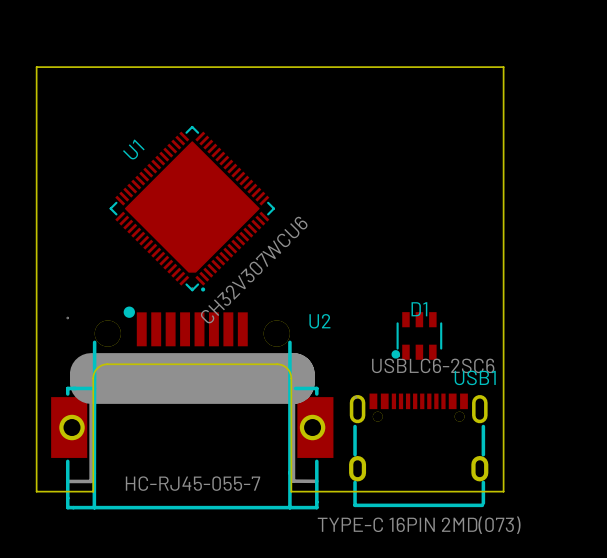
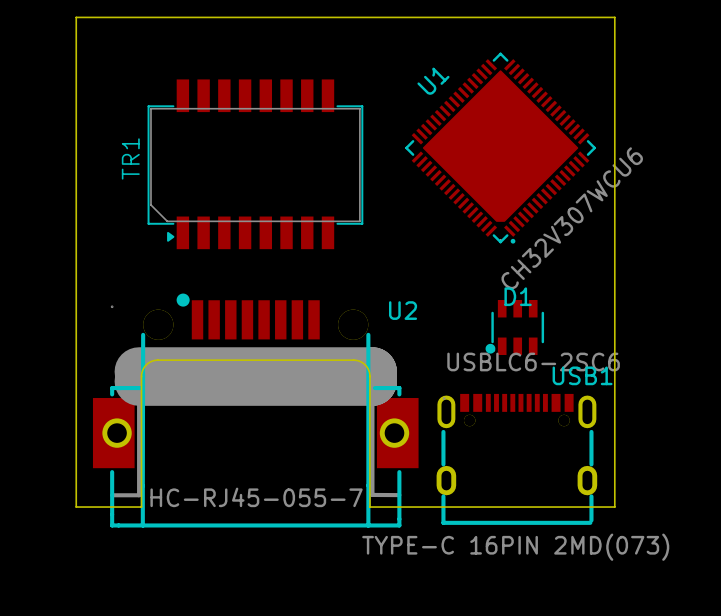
TR1: none -> (255, 164)
U1 position: (192, 208) -> (500, 148)

